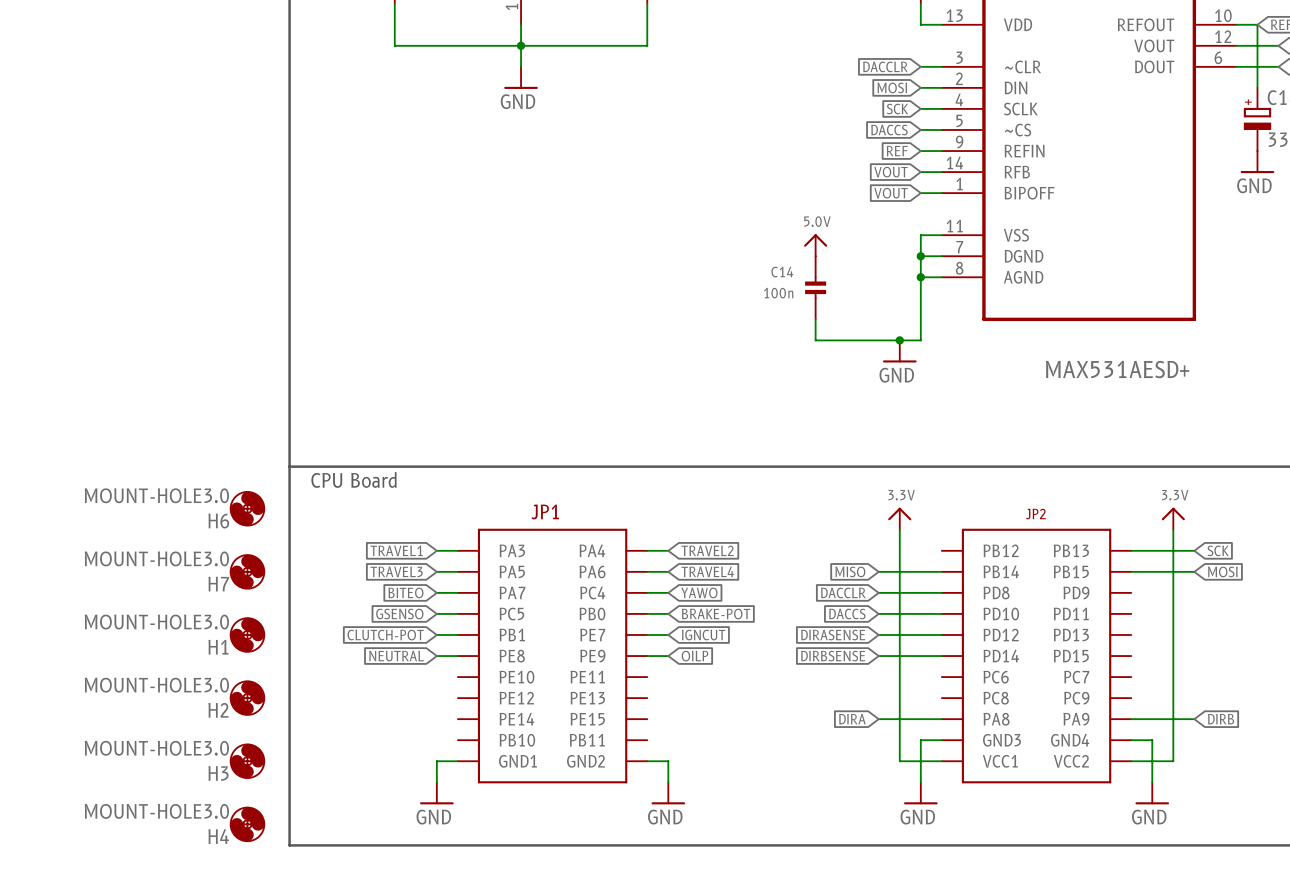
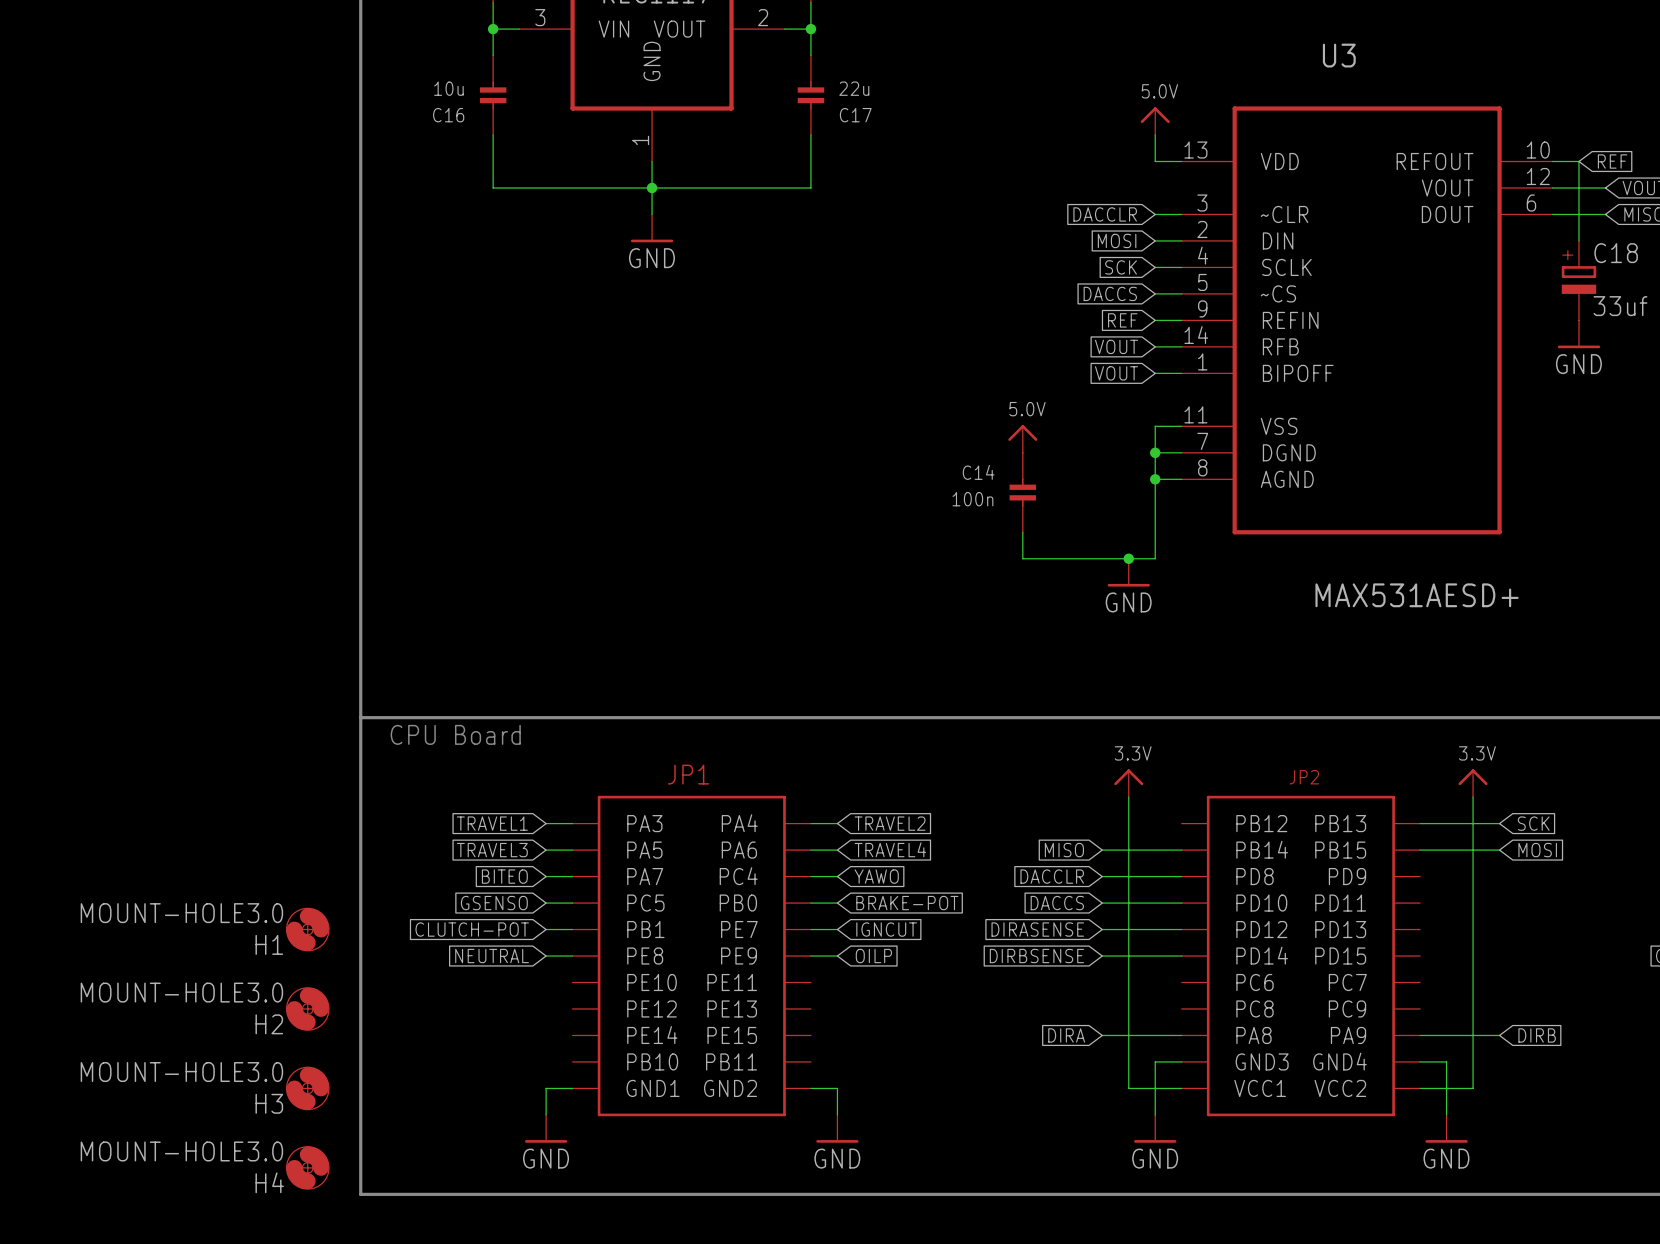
H6: MOUNT-HOLE3.0 (247, 508) -> none
H7: MOUNT-HOLE3.0 (247, 571) -> none

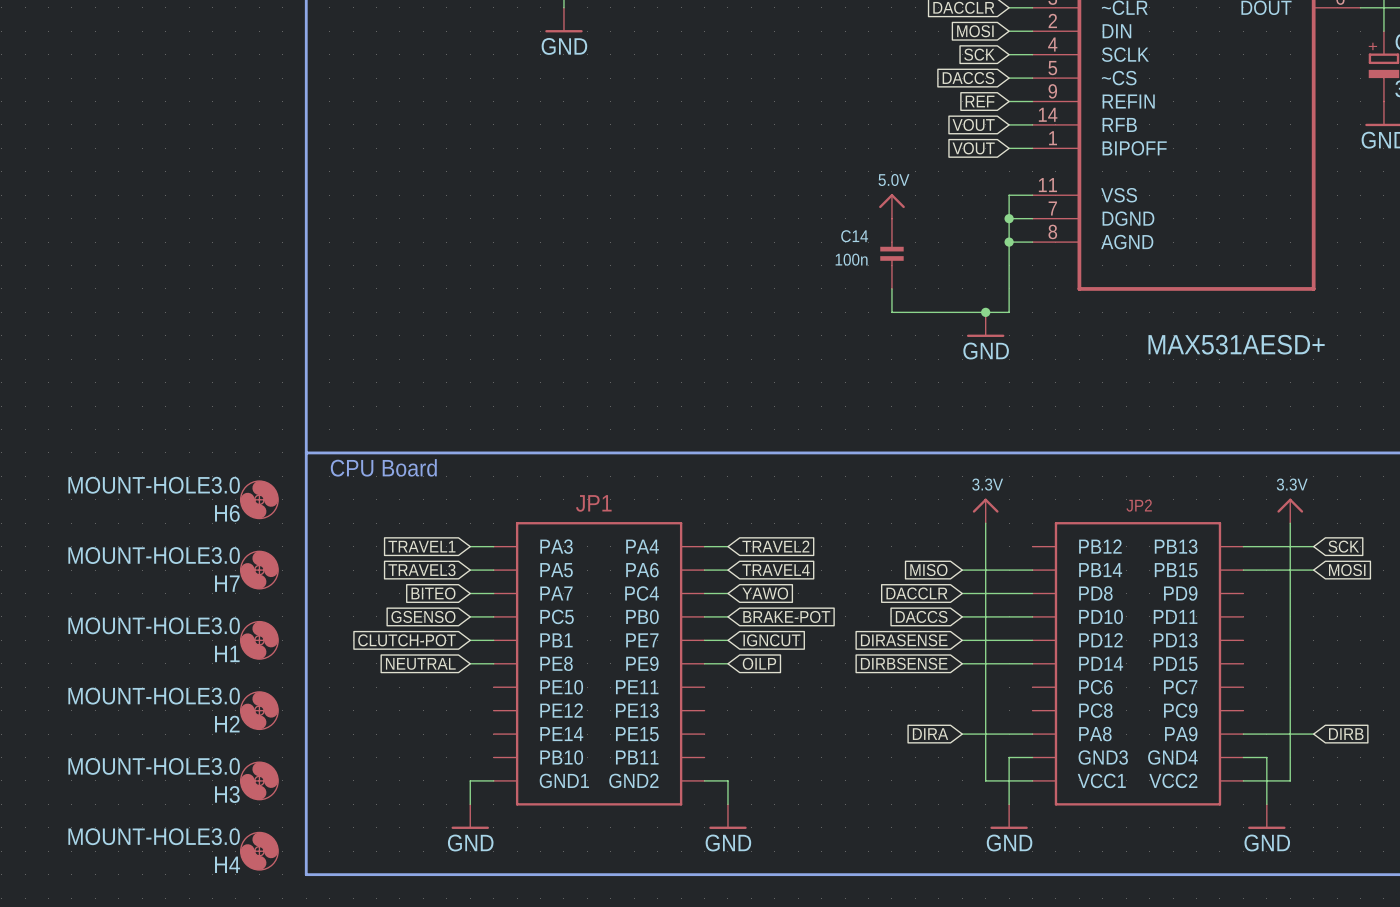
H6: none -> MOUNT-HOLE3.0 (259, 499)
H7: none -> MOUNT-HOLE3.0 (259, 570)

